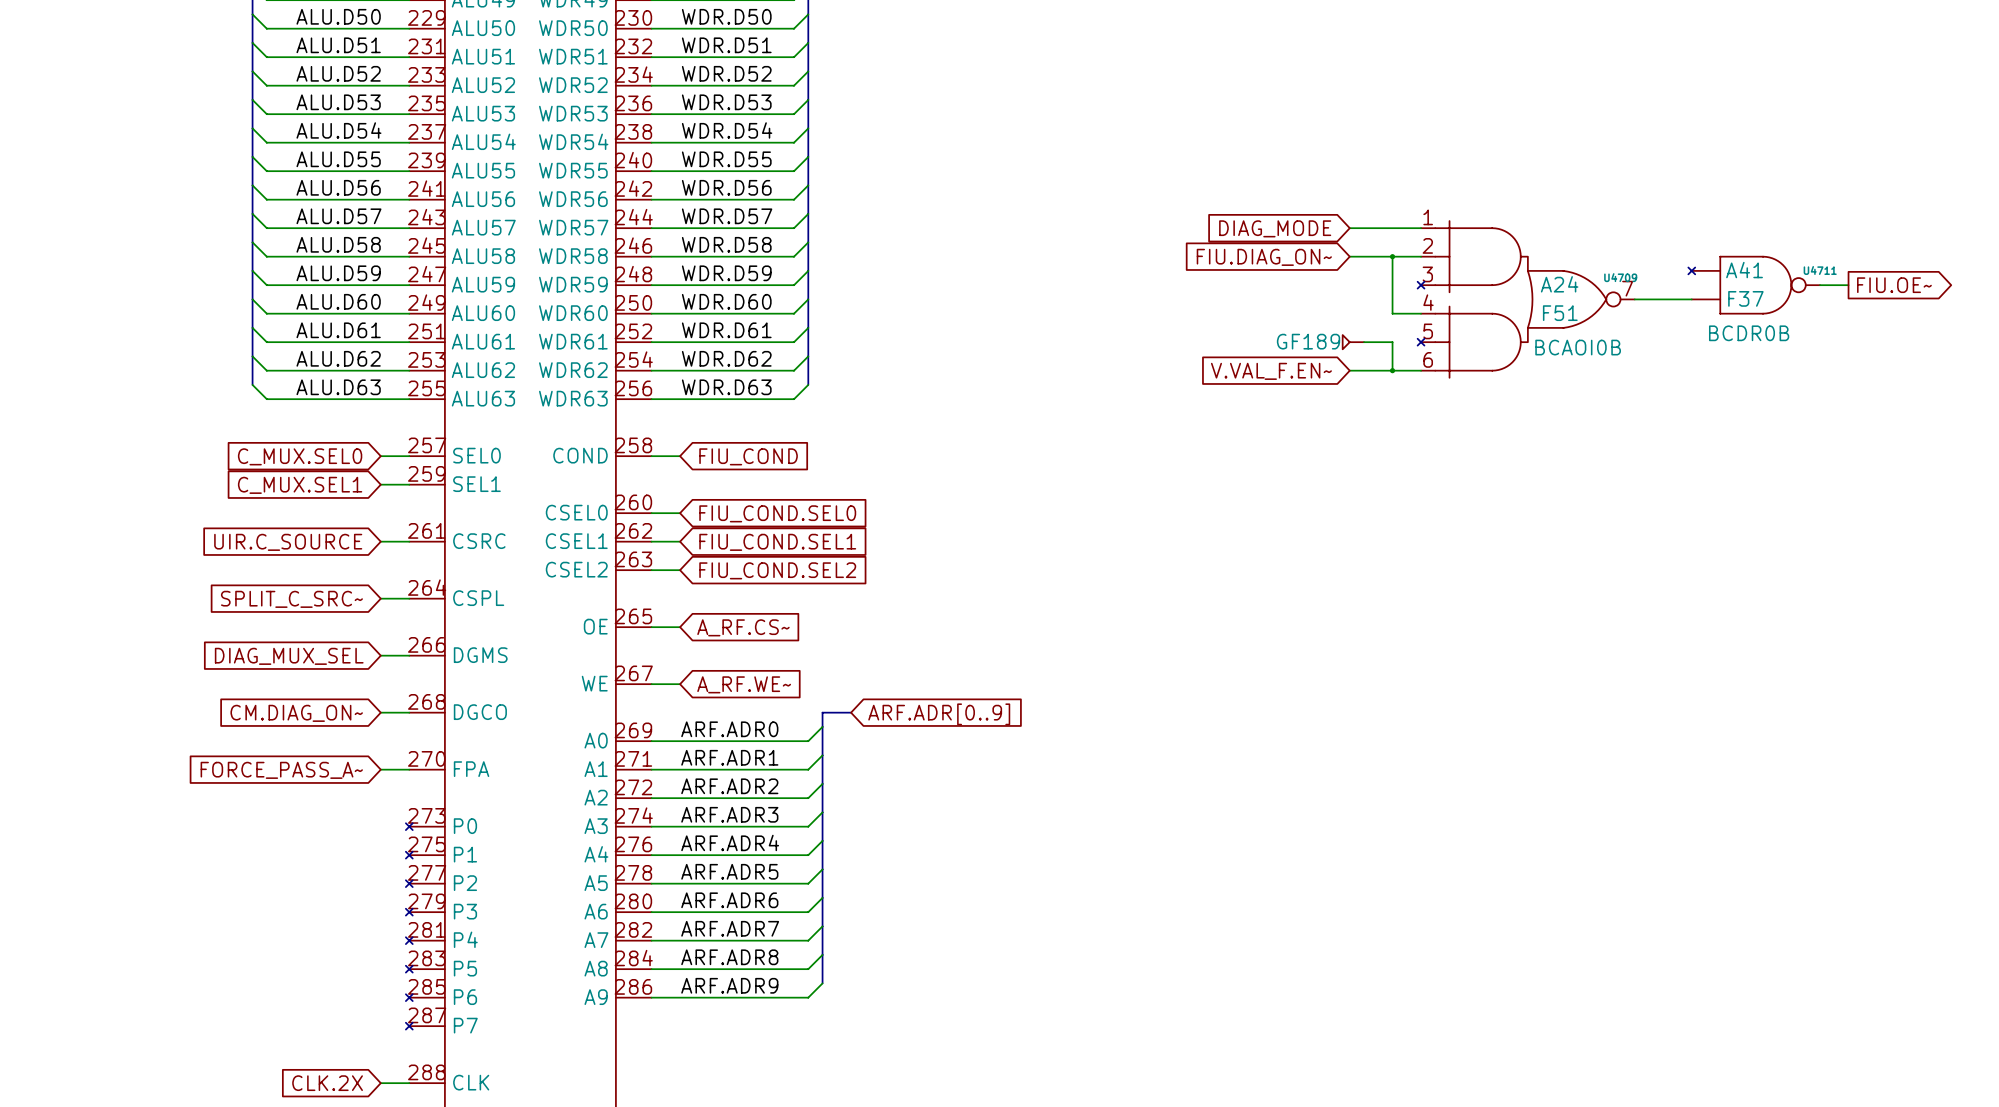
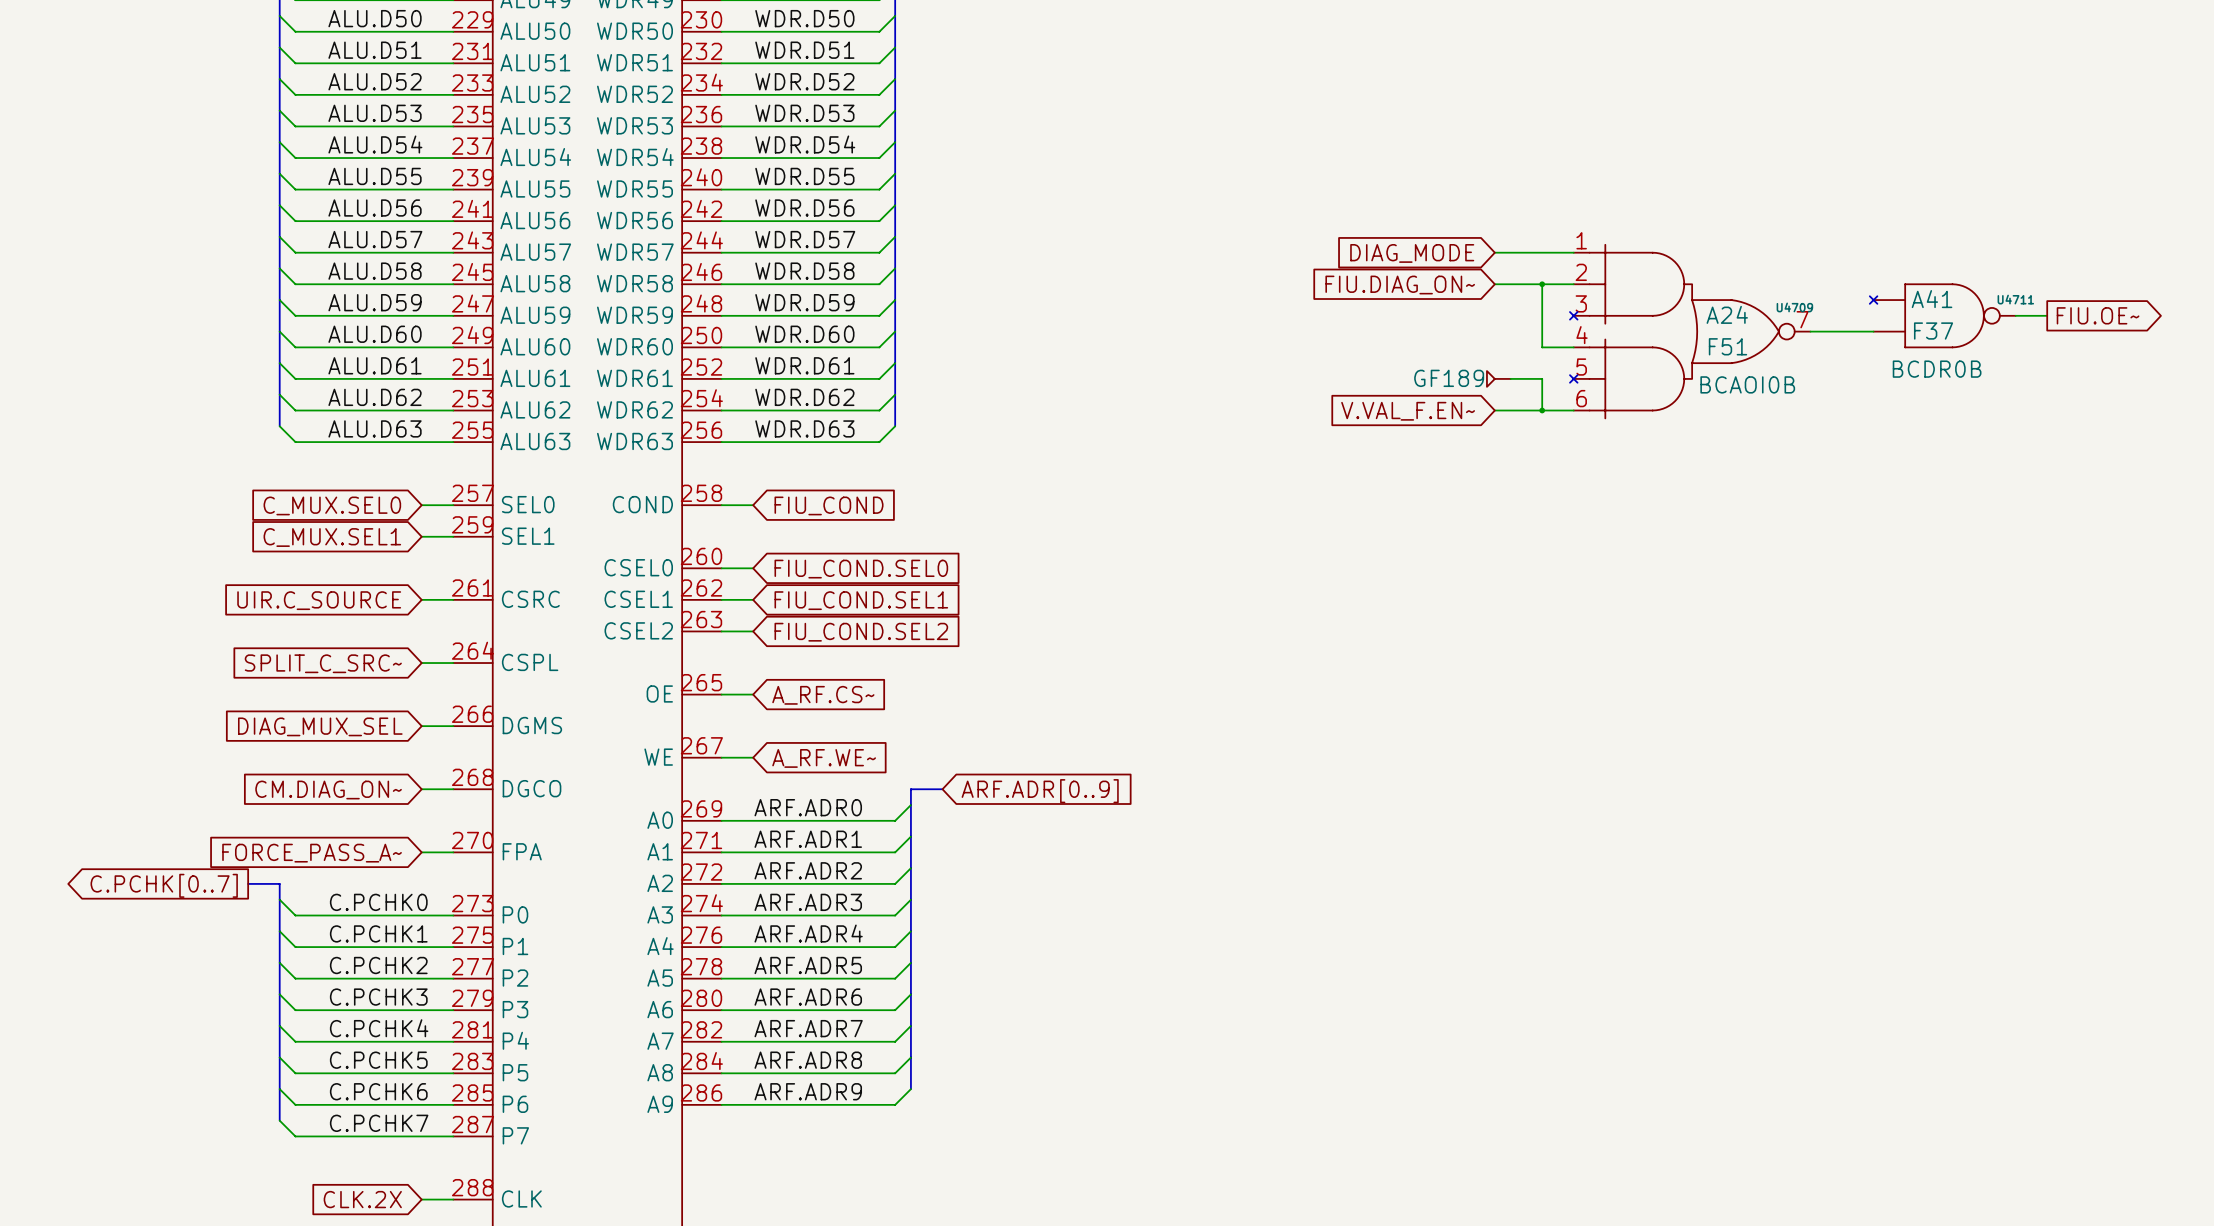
bus: none -> (248, 883) (279, 883) (279, 1120)
global label: none -> C.PCHK[0..7] (164, 885)
wire: none -> (279, 899) (295, 915) (453, 915)
label: none -> C.PCHK0 (378, 902)
no-connect mark: (409, 826) -> none
wire: none -> (279, 931) (295, 947) (453, 947)
label: none -> C.PCHK1 (378, 933)
no-connect mark: (409, 855) -> none
wire: none -> (279, 962) (295, 978) (453, 978)
label: none -> C.PCHK2 (378, 965)
no-connect mark: (409, 883) -> none
wire: none -> (279, 994) (295, 1010) (453, 1010)
label: none -> C.PCHK3 (378, 997)
no-connect mark: (409, 912) -> none
wire: none -> (279, 1025) (295, 1041) (453, 1041)
label: none -> C.PCHK4 (379, 1028)
no-connect mark: (409, 940) -> none
wire: none -> (279, 1057) (295, 1073) (453, 1073)
label: none -> C.PCHK5 (378, 1060)
no-connect mark: (409, 969) -> none
wire: none -> (279, 1089) (295, 1104) (453, 1104)
label: none -> C.PCHK6 (378, 1091)
no-connect mark: (409, 997) -> none
wire: none -> (279, 1120) (295, 1136) (453, 1136)
label: none -> C.PCHK7 (379, 1123)
no-connect mark: (409, 1026) -> none

